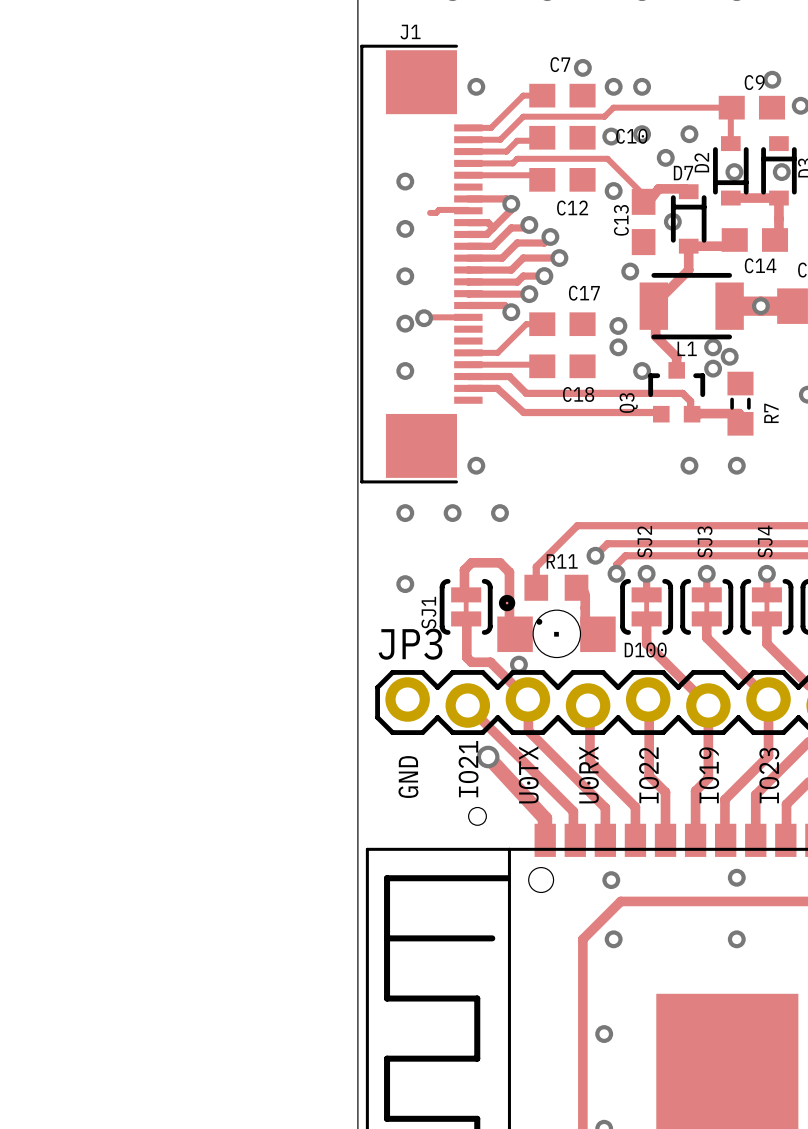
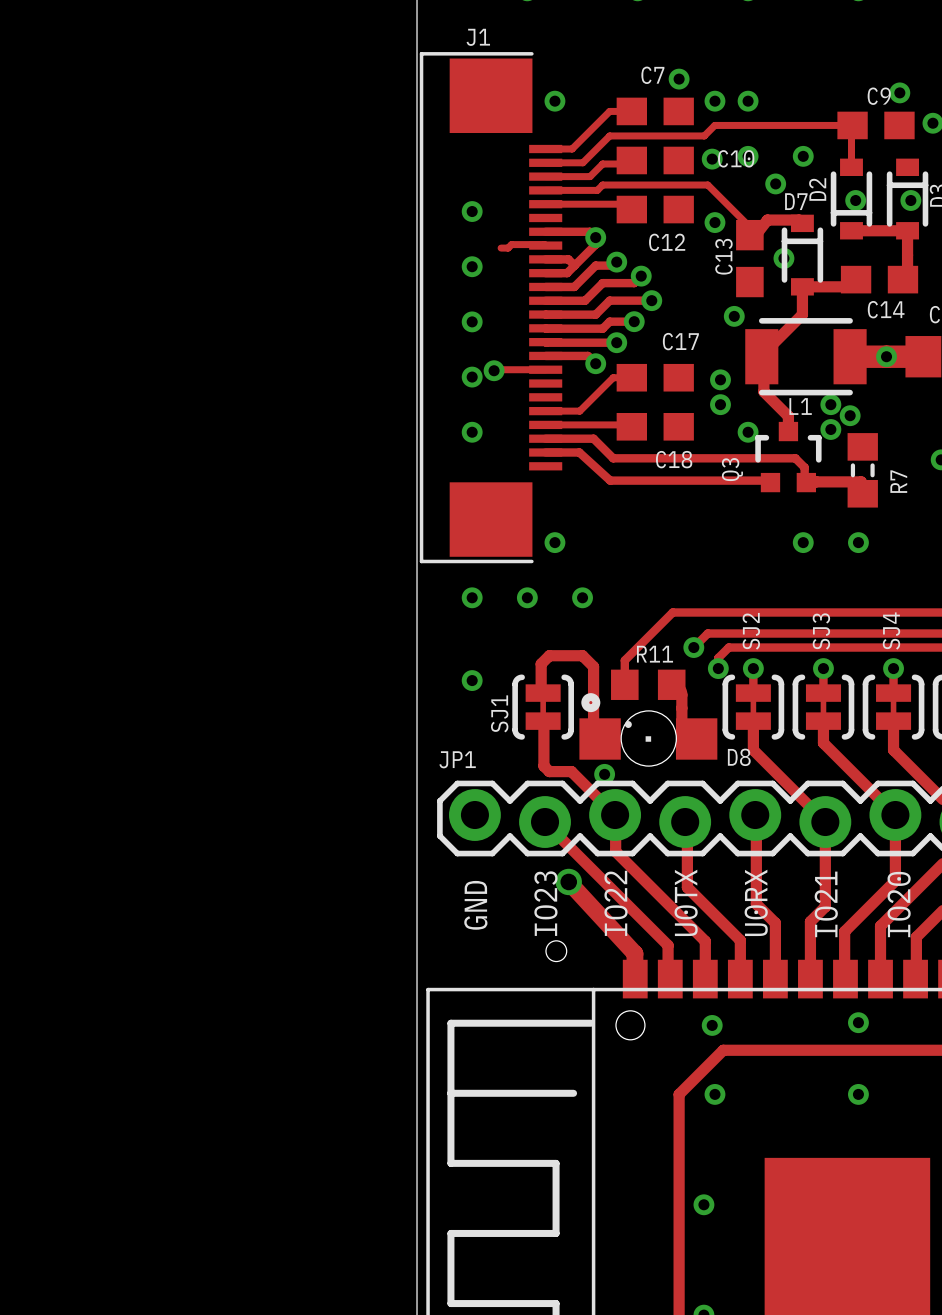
JP3 name: JP3 (410, 644) -> JP1 (457, 759)
D100 name: D100 (645, 650) -> D8 (739, 757)
text: IO21 (468, 769) -> IO23 (545, 903)
text: U0TX (528, 774) -> IO22 (616, 903)
text: U0RX (588, 774) -> U0TX (686, 902)
text: IO22 (649, 775) -> U0RX (756, 902)
text: IO19 (709, 775) -> IO21 (826, 904)
text: IO23 (769, 775) -> IO20 (899, 904)

